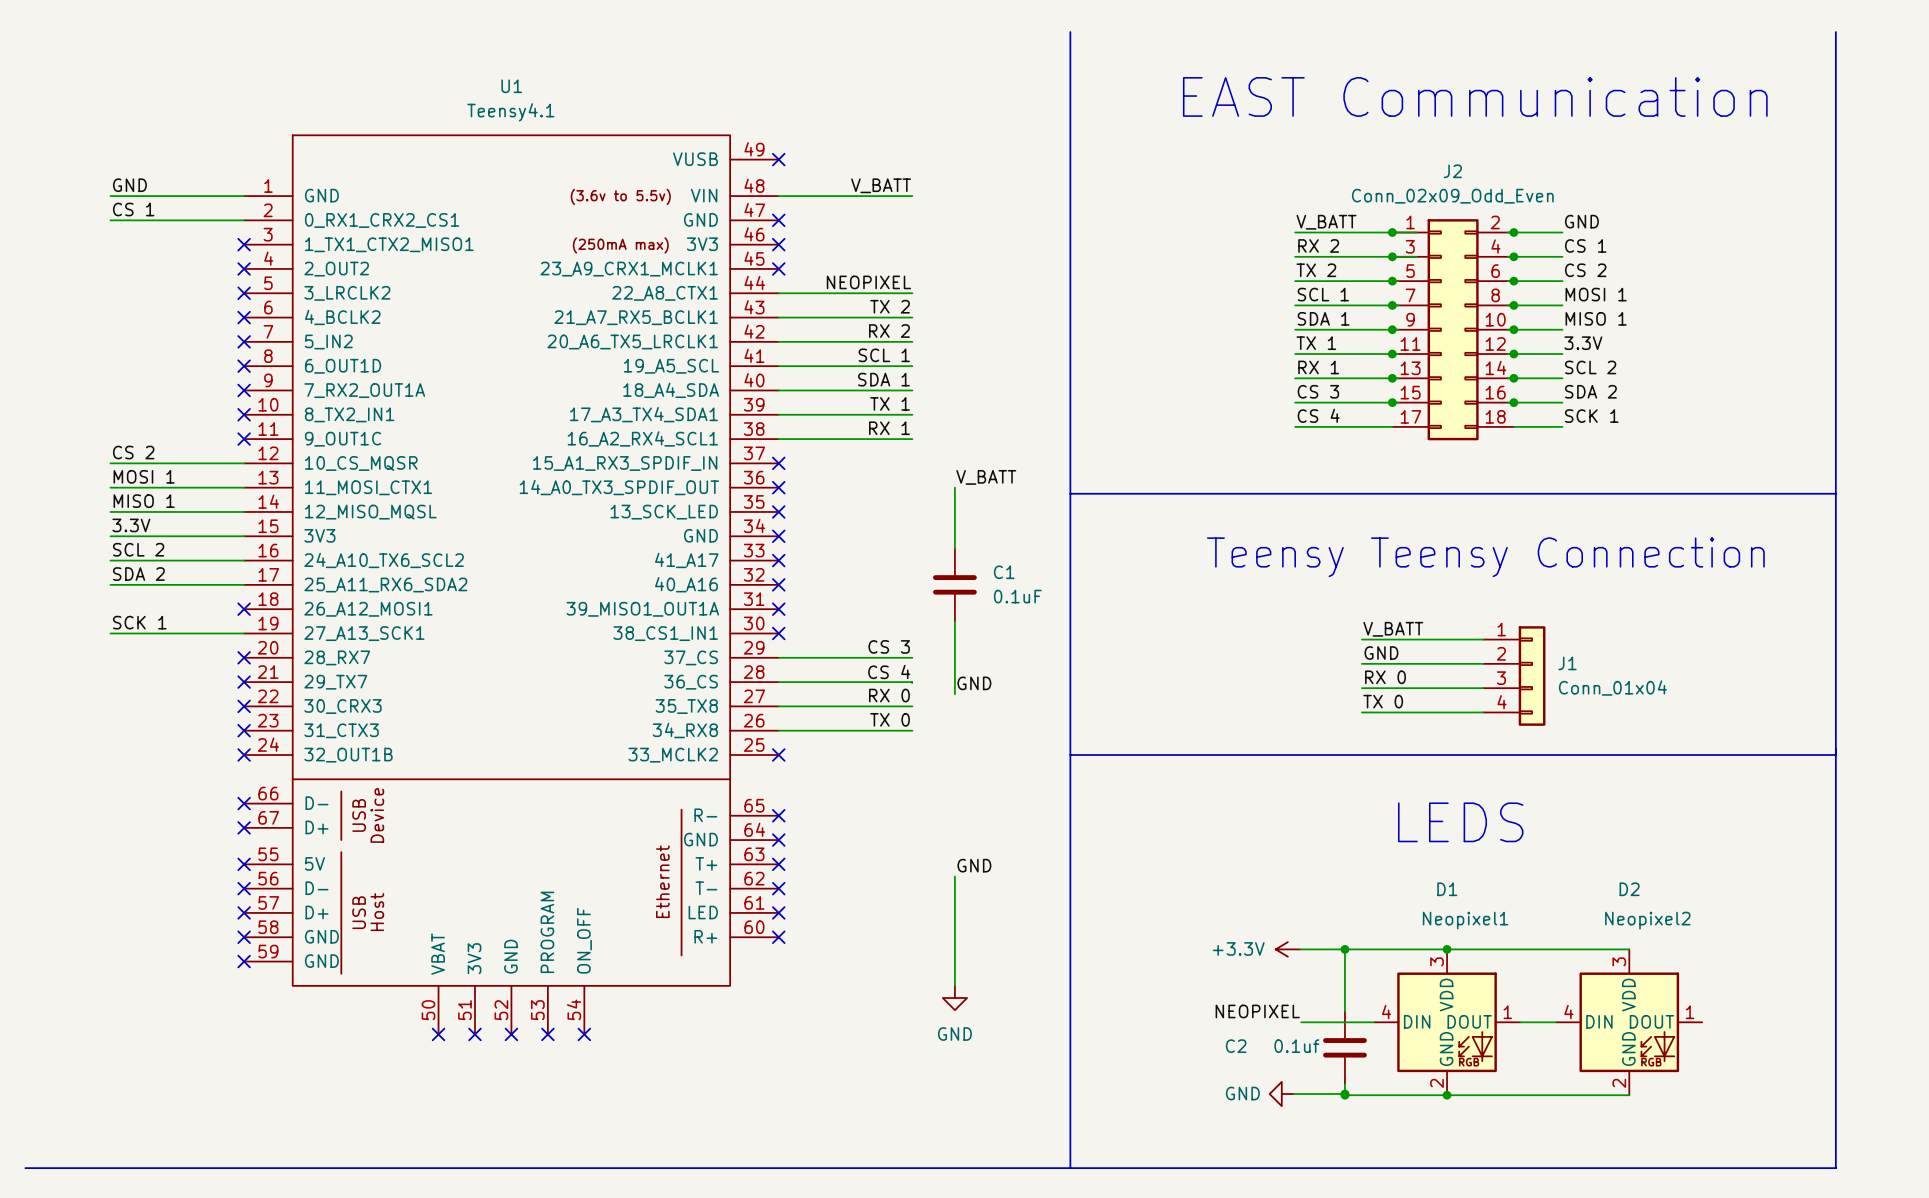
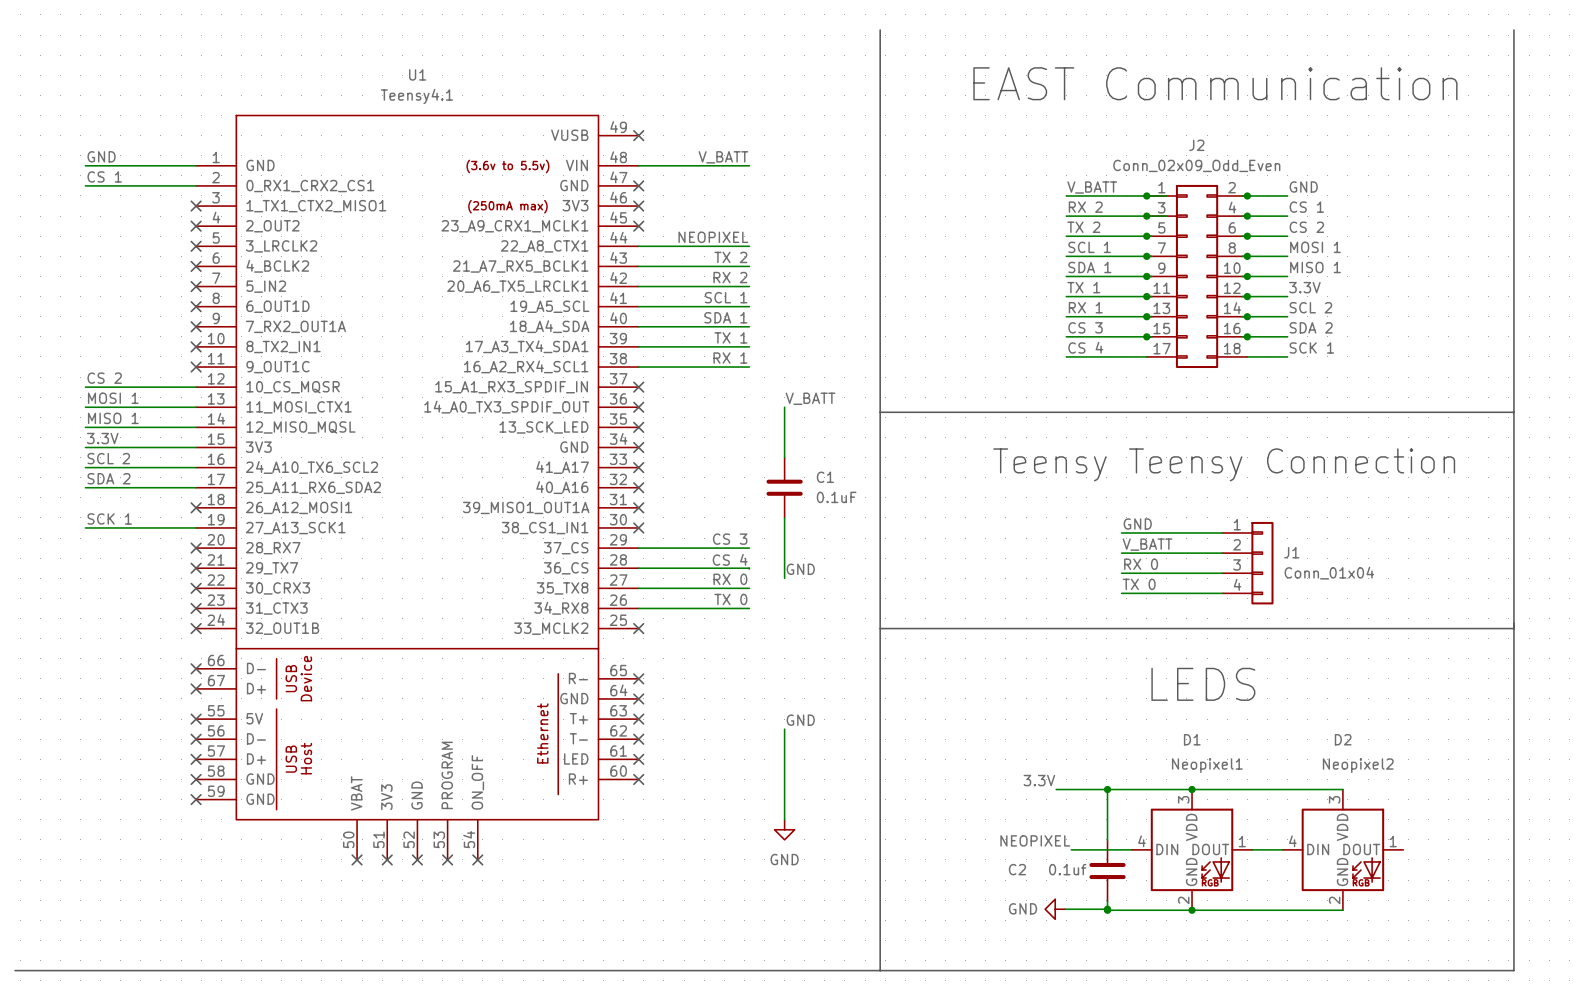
label: V_BATT (1393, 629) -> GND (1137, 524)
label: GND (1381, 653) -> V_BATT (1147, 544)
label: none -> 3.3V (1039, 780)
power symbol: +3.3V (1287, 949) -> none

